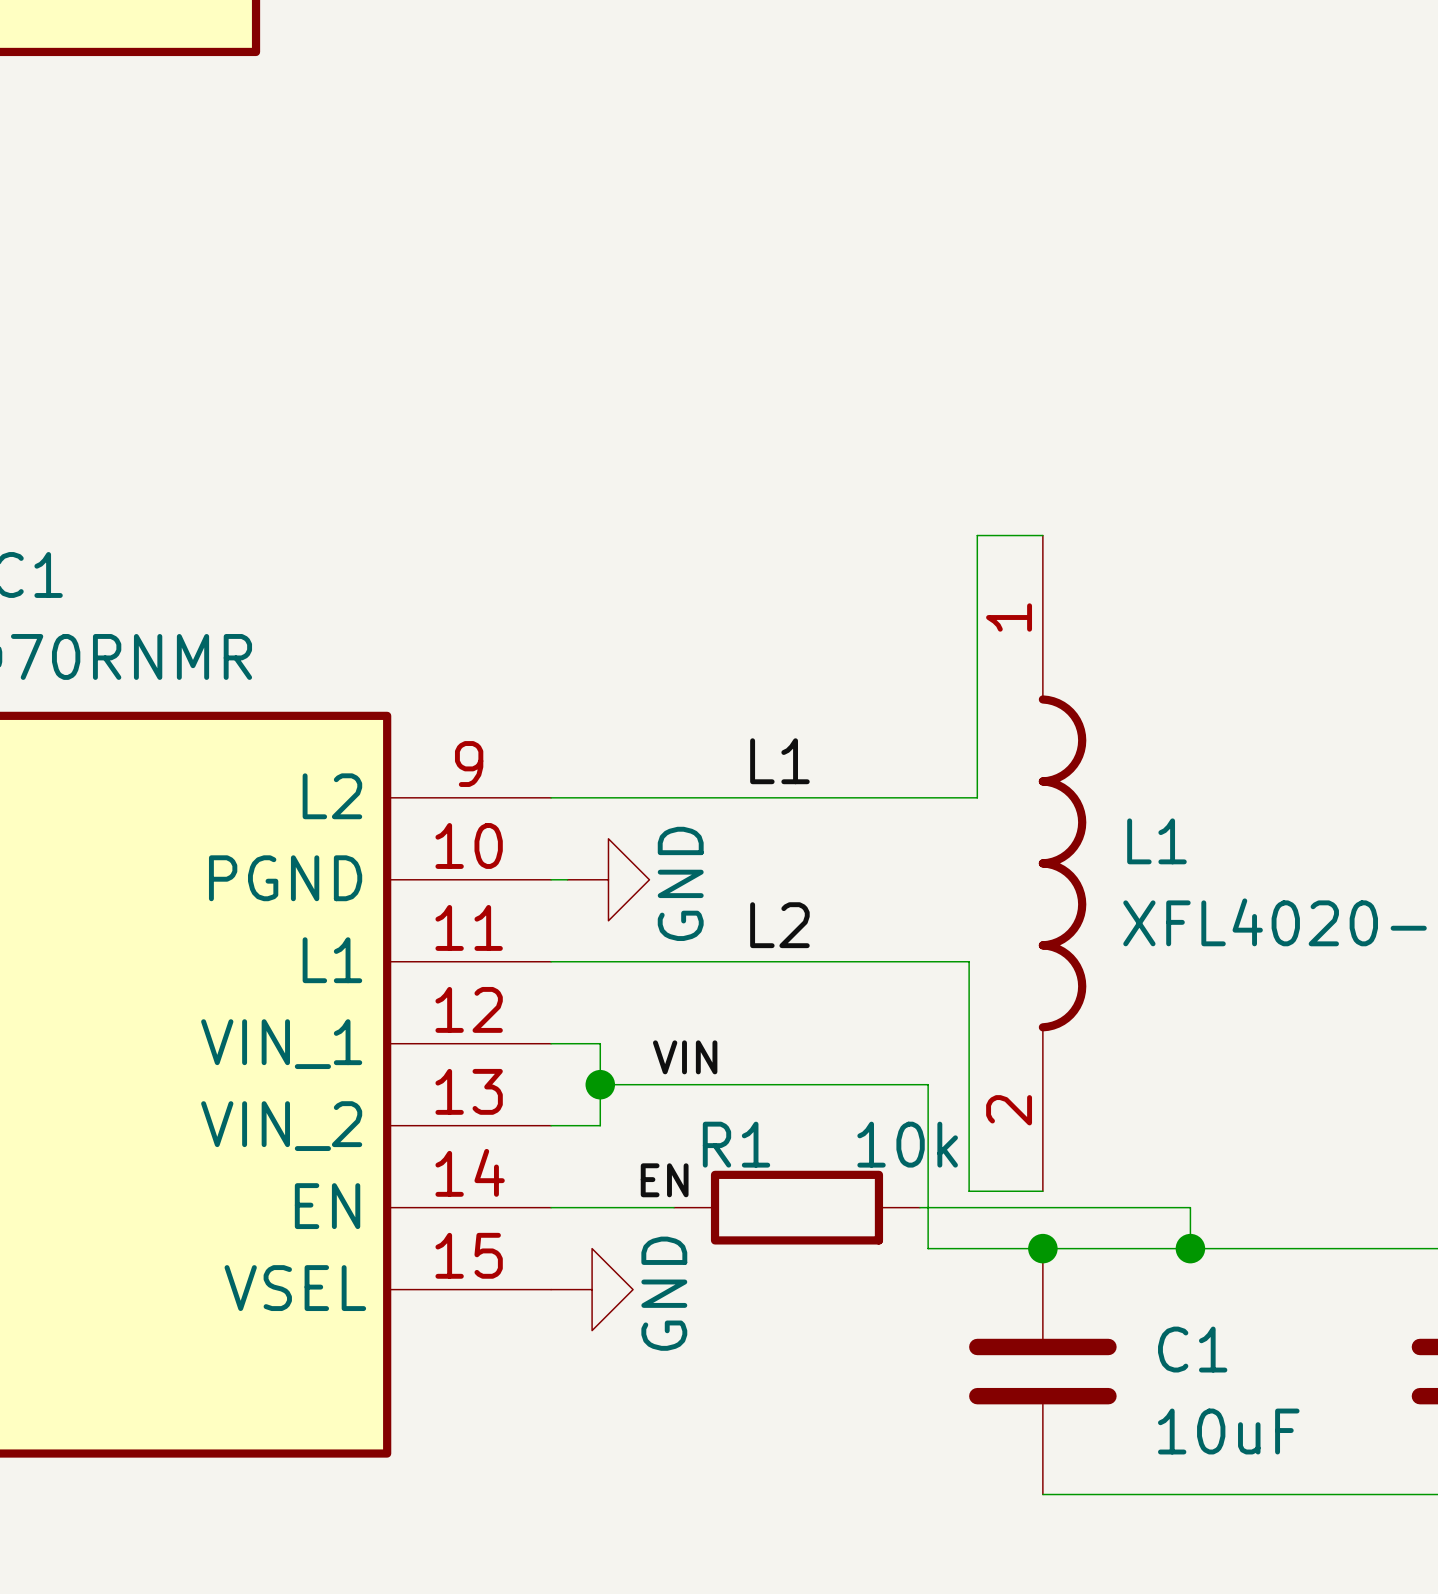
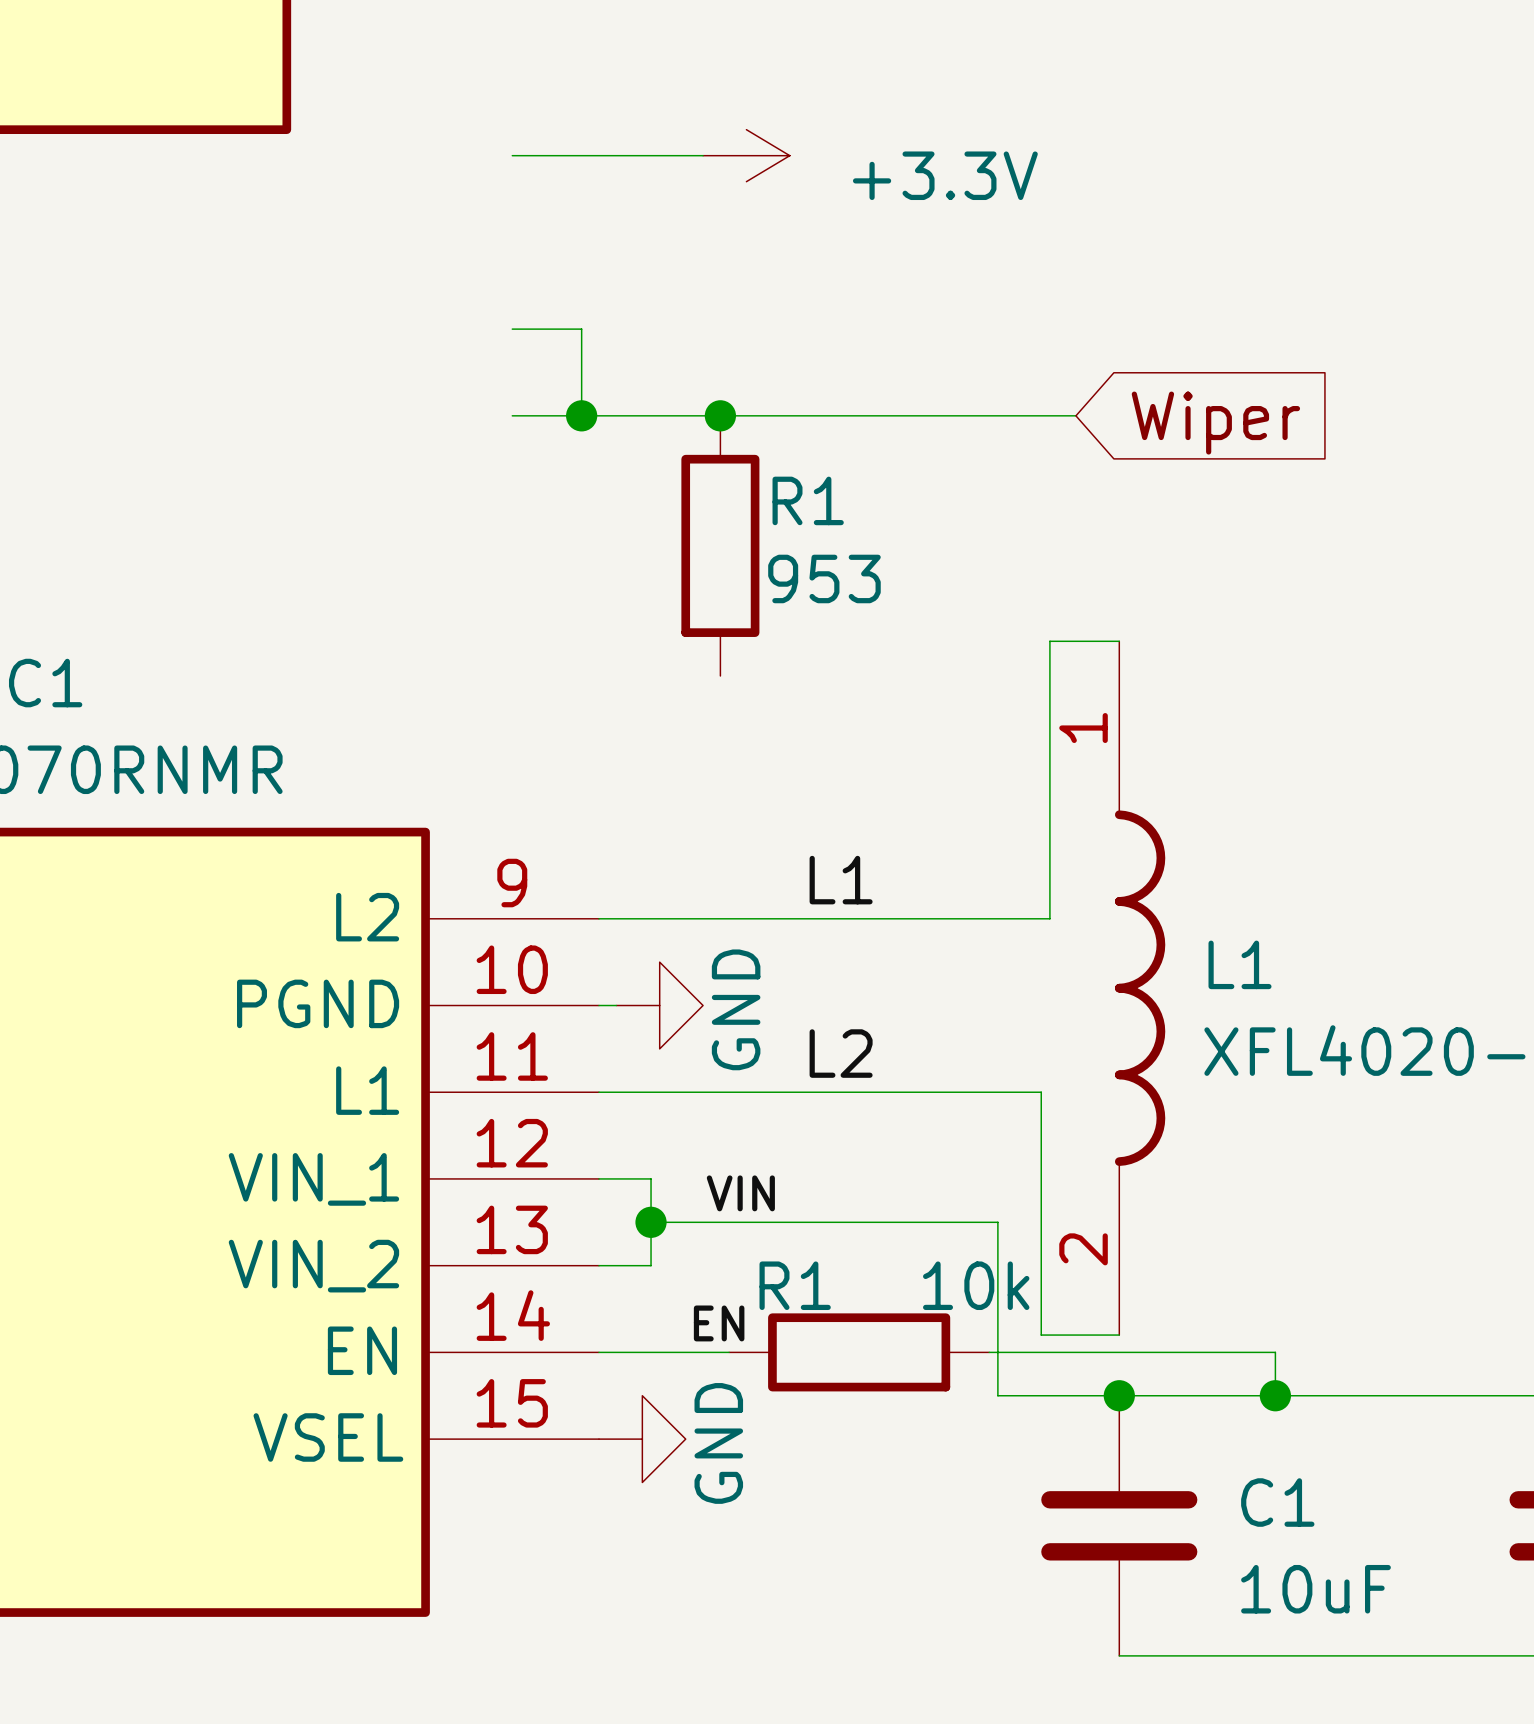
wire: none -> (512, 155) (703, 155)
power symbol: none -> +3.3V (746, 155)
wire: none -> (512, 329) (581, 329) (581, 415)
wire: none -> (512, 415) (1075, 415)
junction: none -> (581, 415)
junction: none -> (720, 415)
global label: none -> Wiper (1215, 423)
R1: none -> 953 (720, 545)

